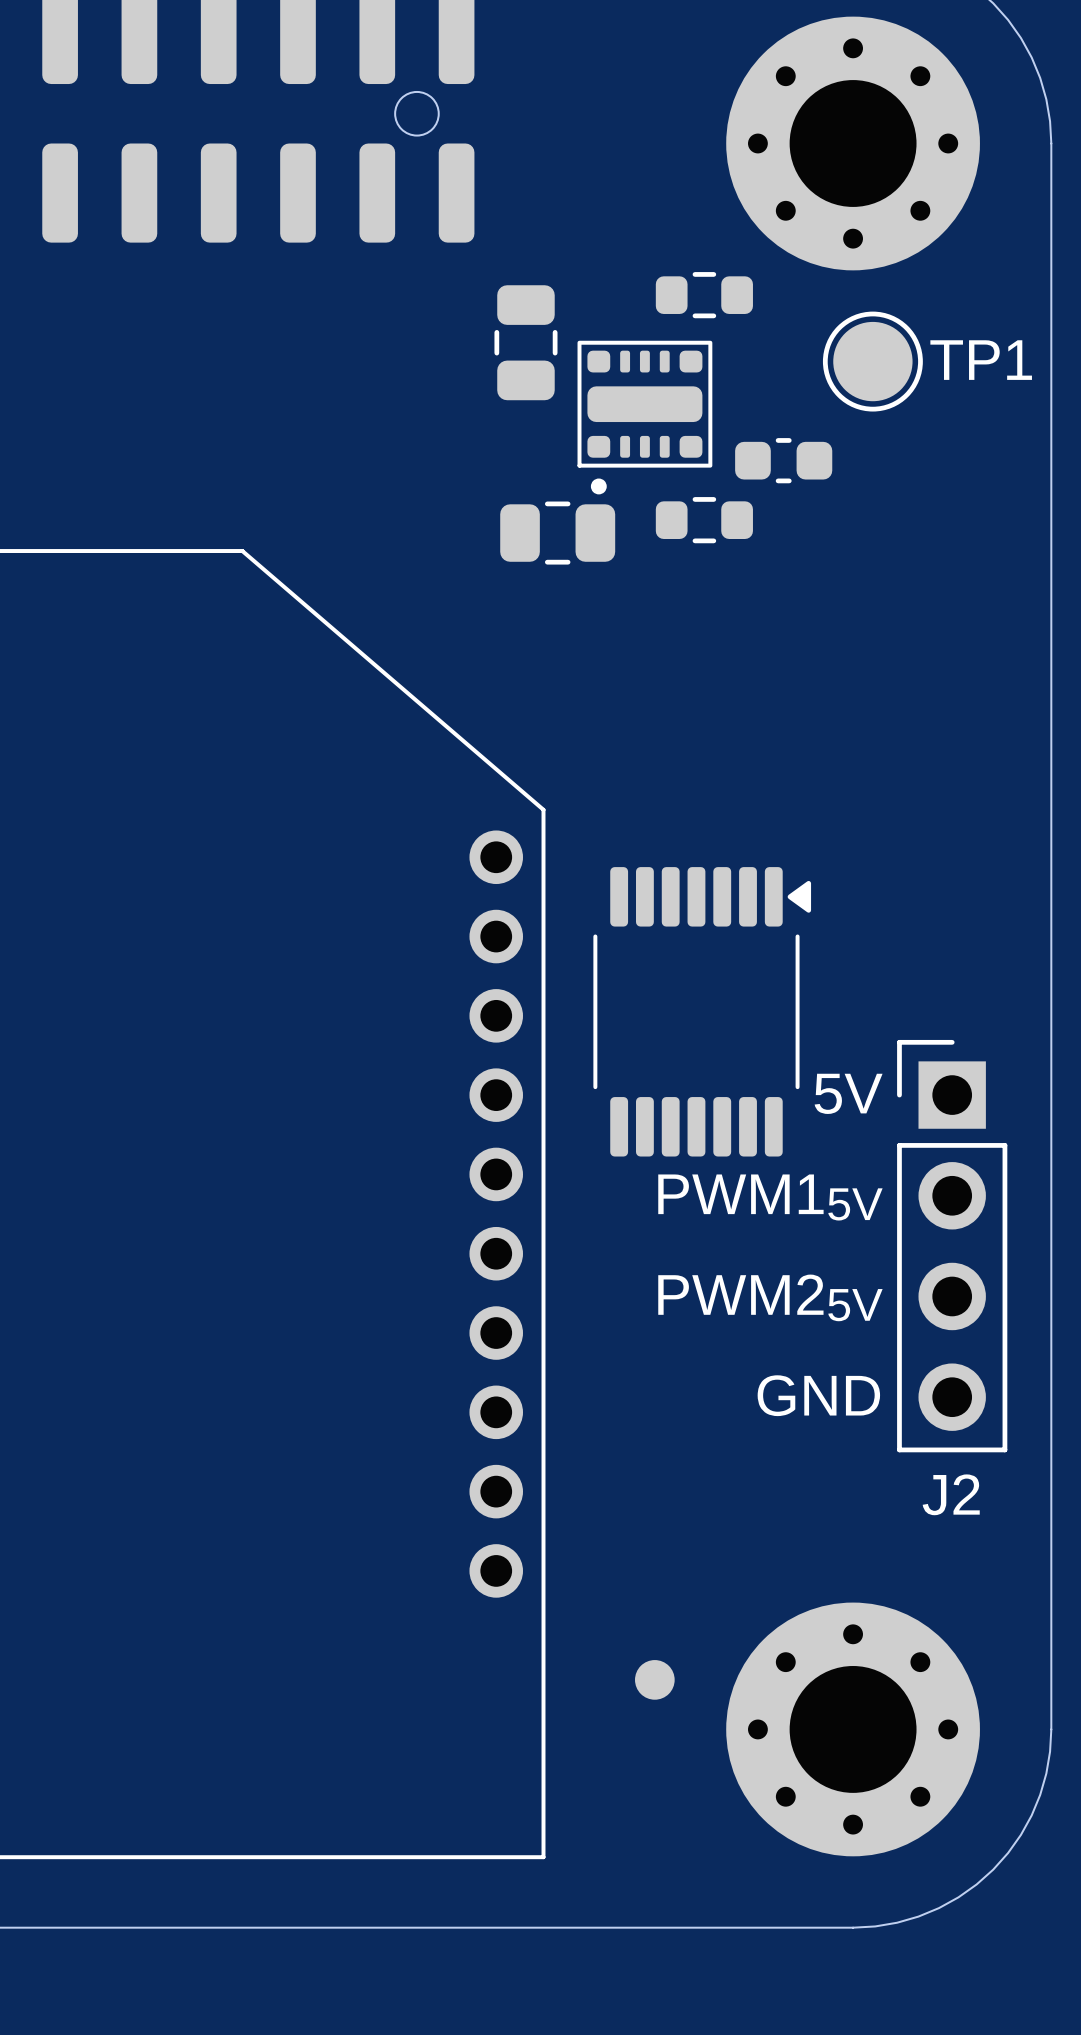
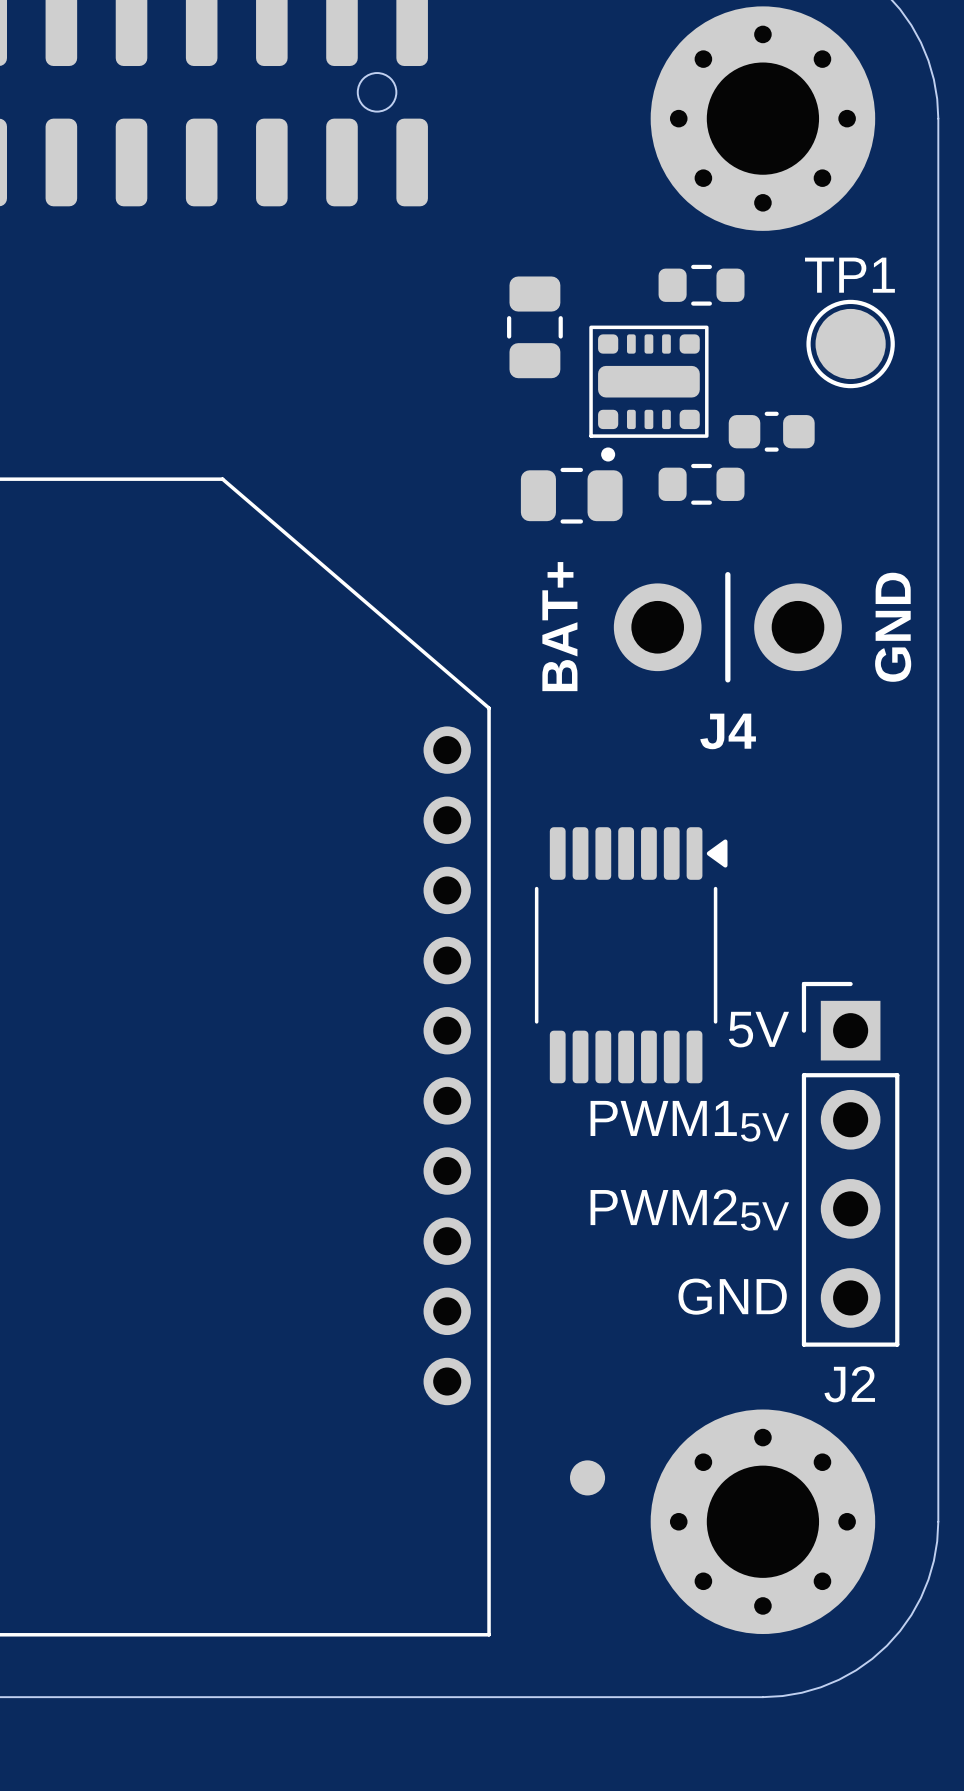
part position: (704, 295) -> (701, 285)
part position: (525, 342) -> (534, 327)
TP1 name position: TP1 (981, 360) -> TP1 (849, 275)
TP1 position: (872, 361) -> (850, 344)
part position: (644, 417) -> (648, 393)
part position: (783, 460) -> (771, 431)
part position: (704, 520) -> (701, 484)
part: (557, 533) -> none
part: none -> (571, 495)
line: none -> (727, 574) (727, 679)
text: none -> BAT+ (559, 626)
J4: none -> (727, 627)
text: none -> GND (893, 627)
part position: (702, 1011) -> (631, 955)
text position: 5V (848, 1093) -> 5V (758, 1029)
text position: PWM15V (770, 1197) -> PWM15V (689, 1121)
J2 position: (952, 1246) -> (850, 1164)
text position: PWM25V (770, 1297) -> PWM25V (689, 1210)
text position: GND (818, 1395) -> GND (732, 1296)

